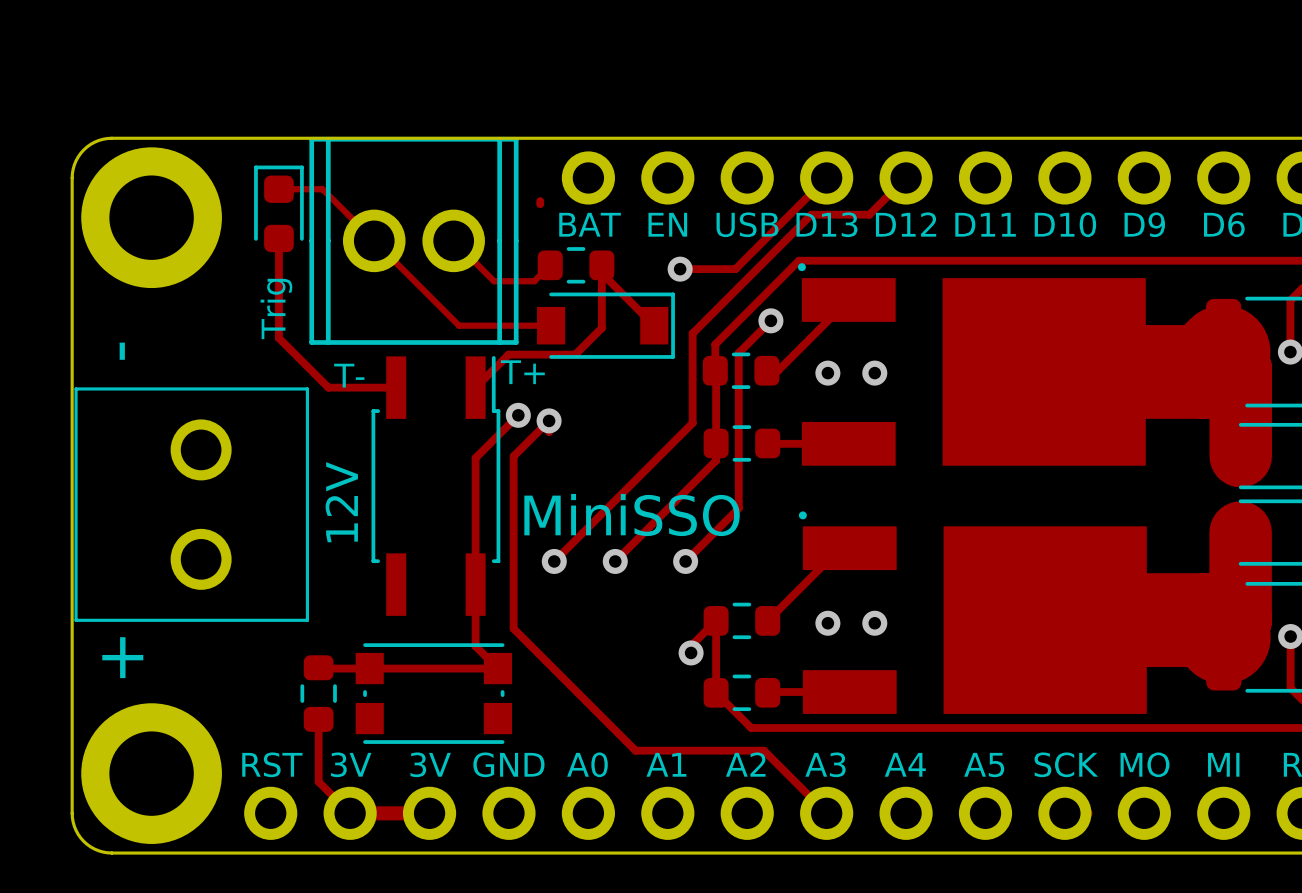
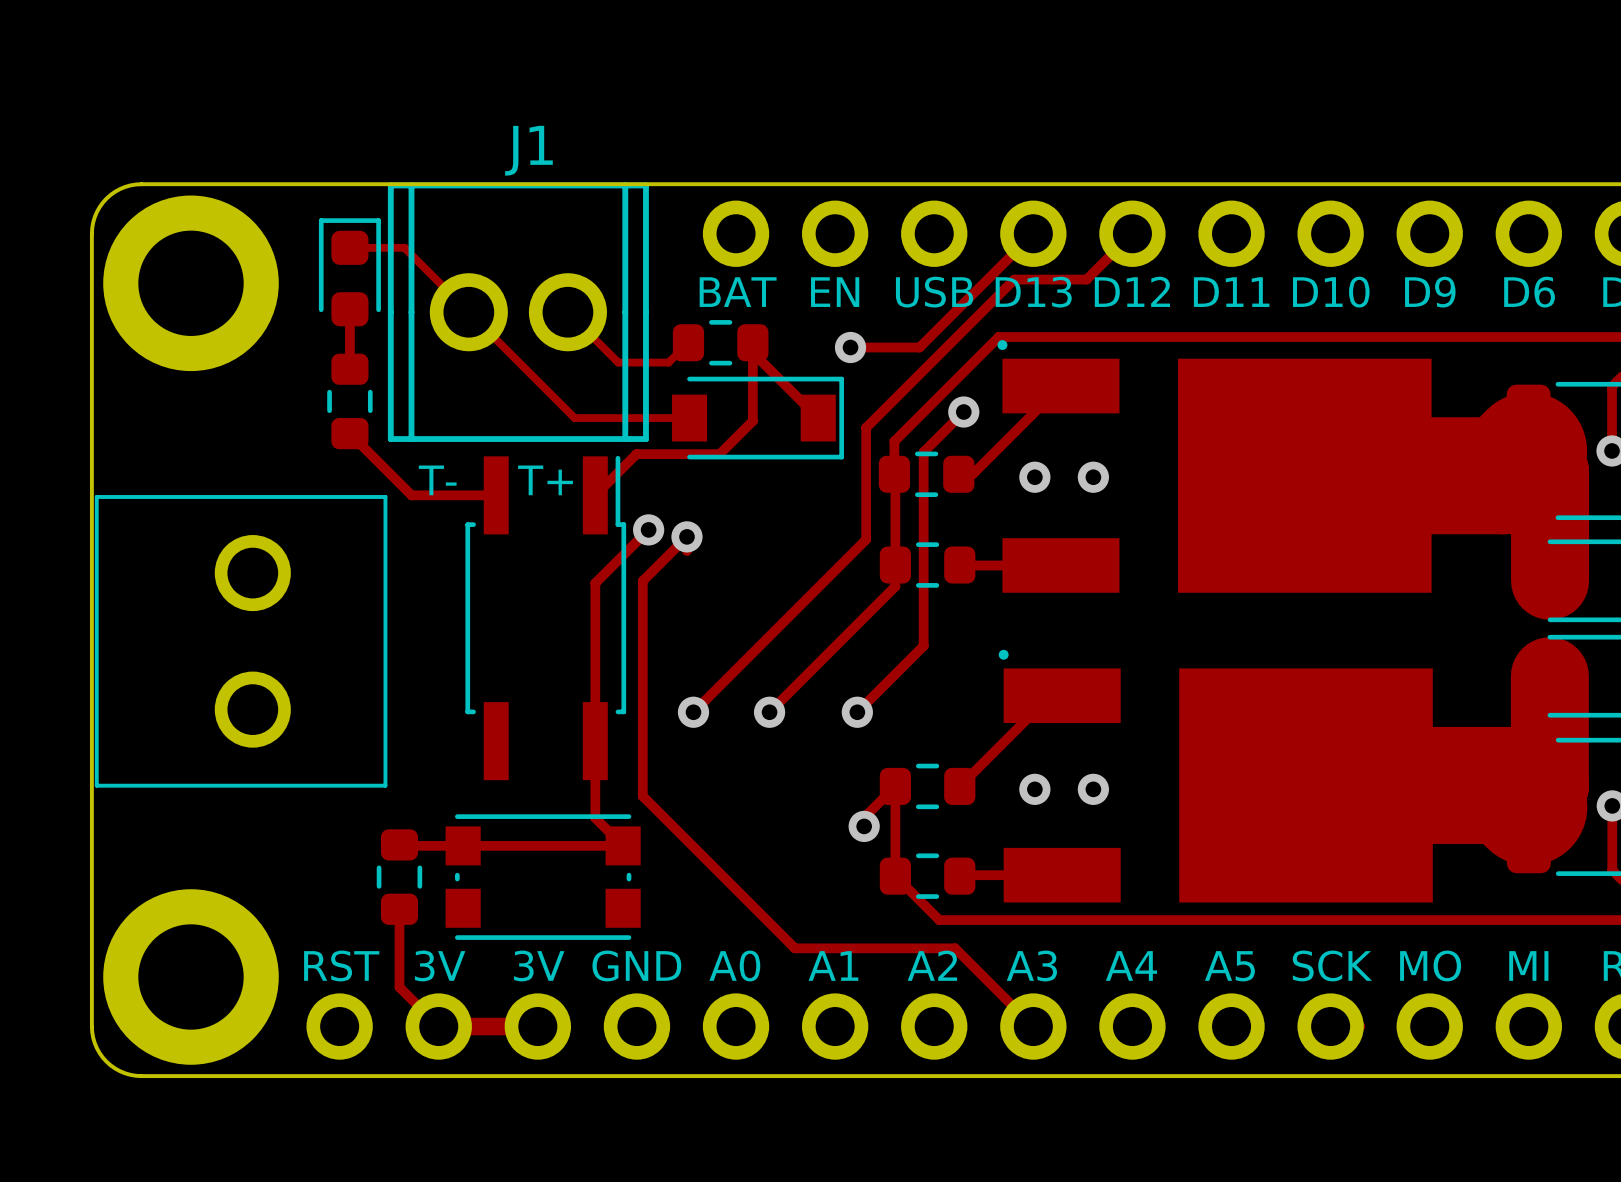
J1 name: none -> J1 (528, 150)
track: (540, 201) (540, 204) -> none
track: (278, 286) (278, 338) -> none
text: Trig (276, 308) -> none
part: none -> (349, 401)
text: - (122, 351) -> none
text position: T+ (522, 372) -> T+ (545, 480)
text: 12V (341, 502) -> none
text: MiniSSO (632, 515) -> none
text: + (122, 657) -> none

